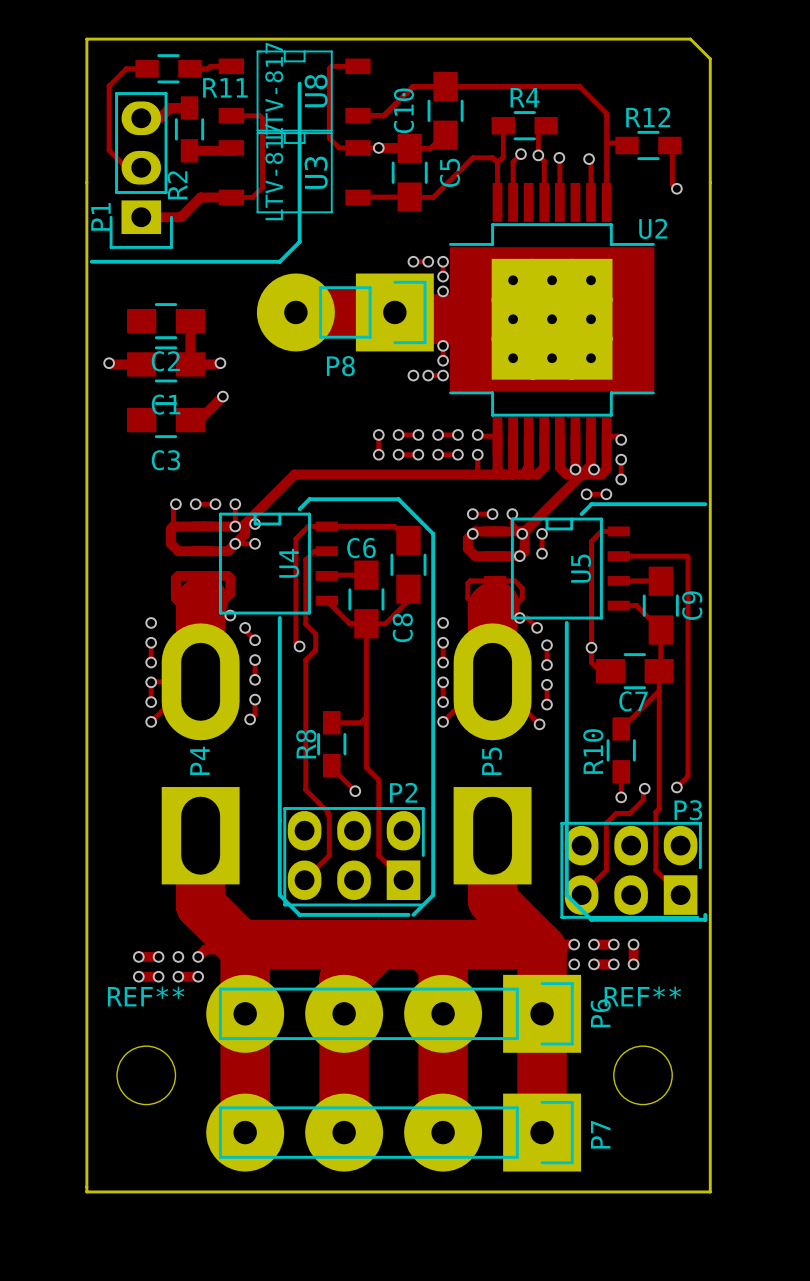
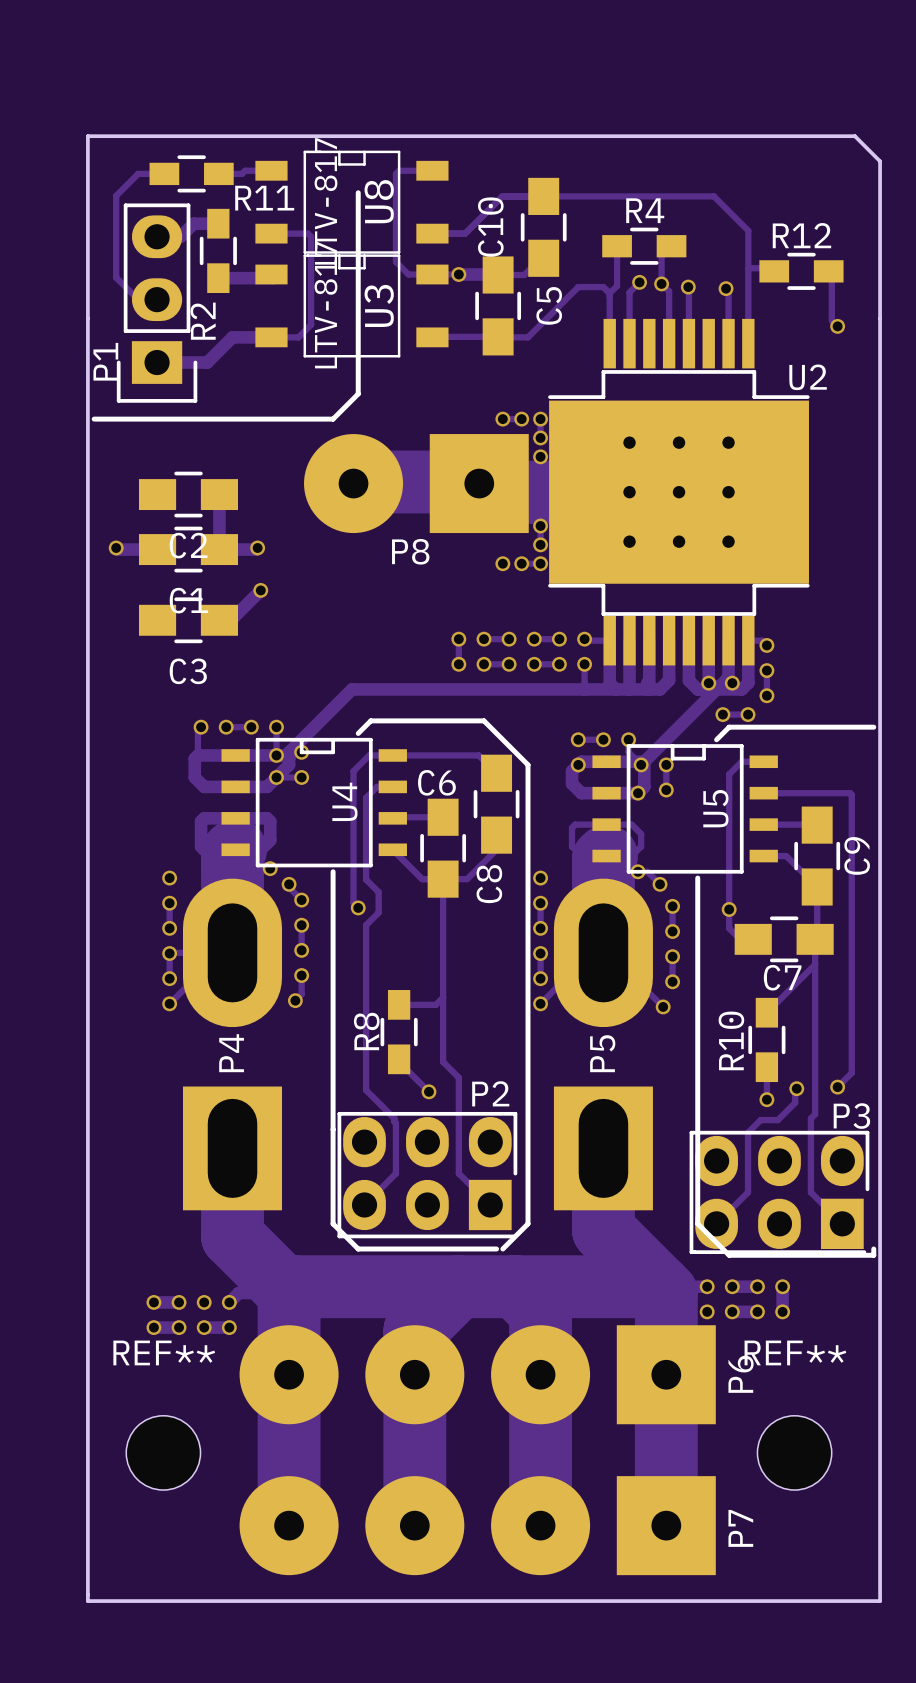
P8 footprint: [256, 273, 434, 352] -> [304, 434, 529, 534]
P6 footprint: [206, 974, 582, 1053] -> [239, 1325, 716, 1425]
P7 footprint: [206, 1093, 582, 1172] -> [239, 1476, 716, 1576]

